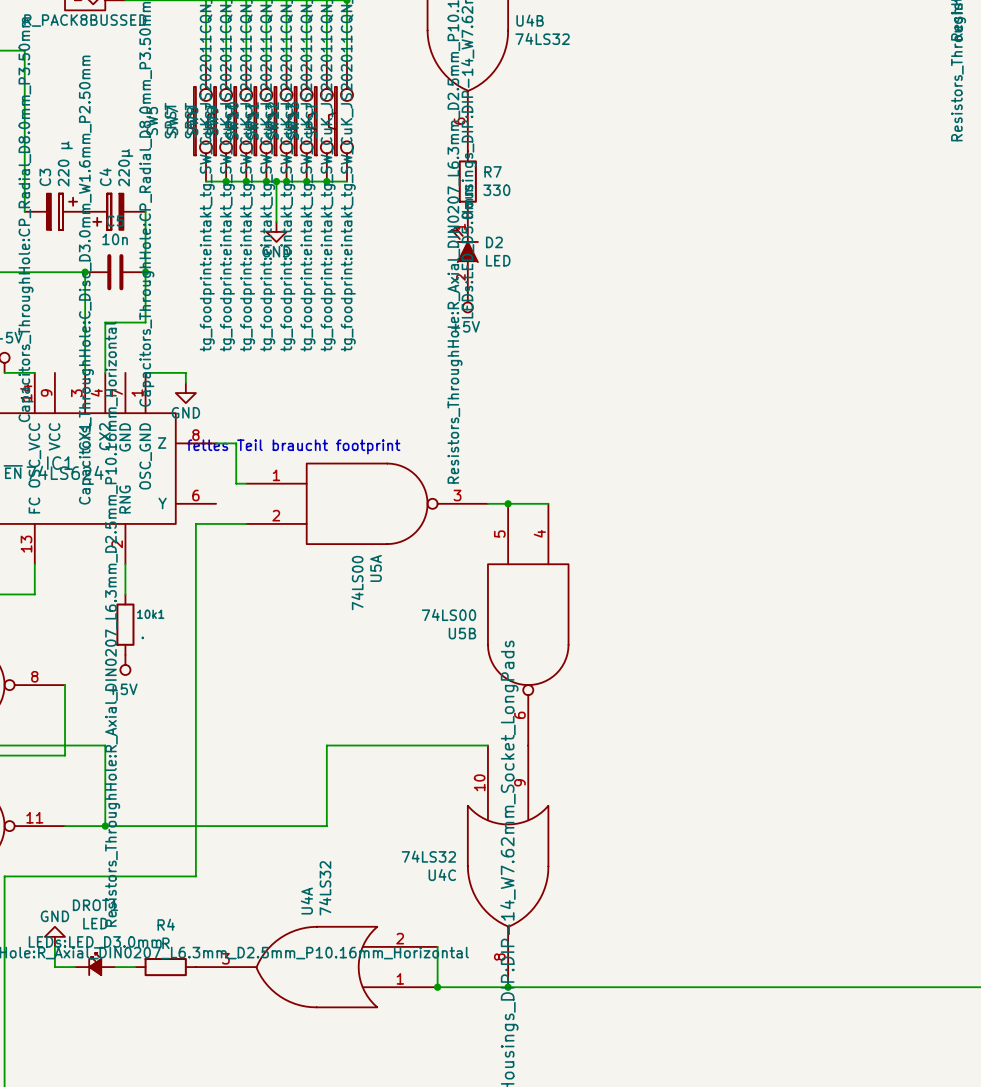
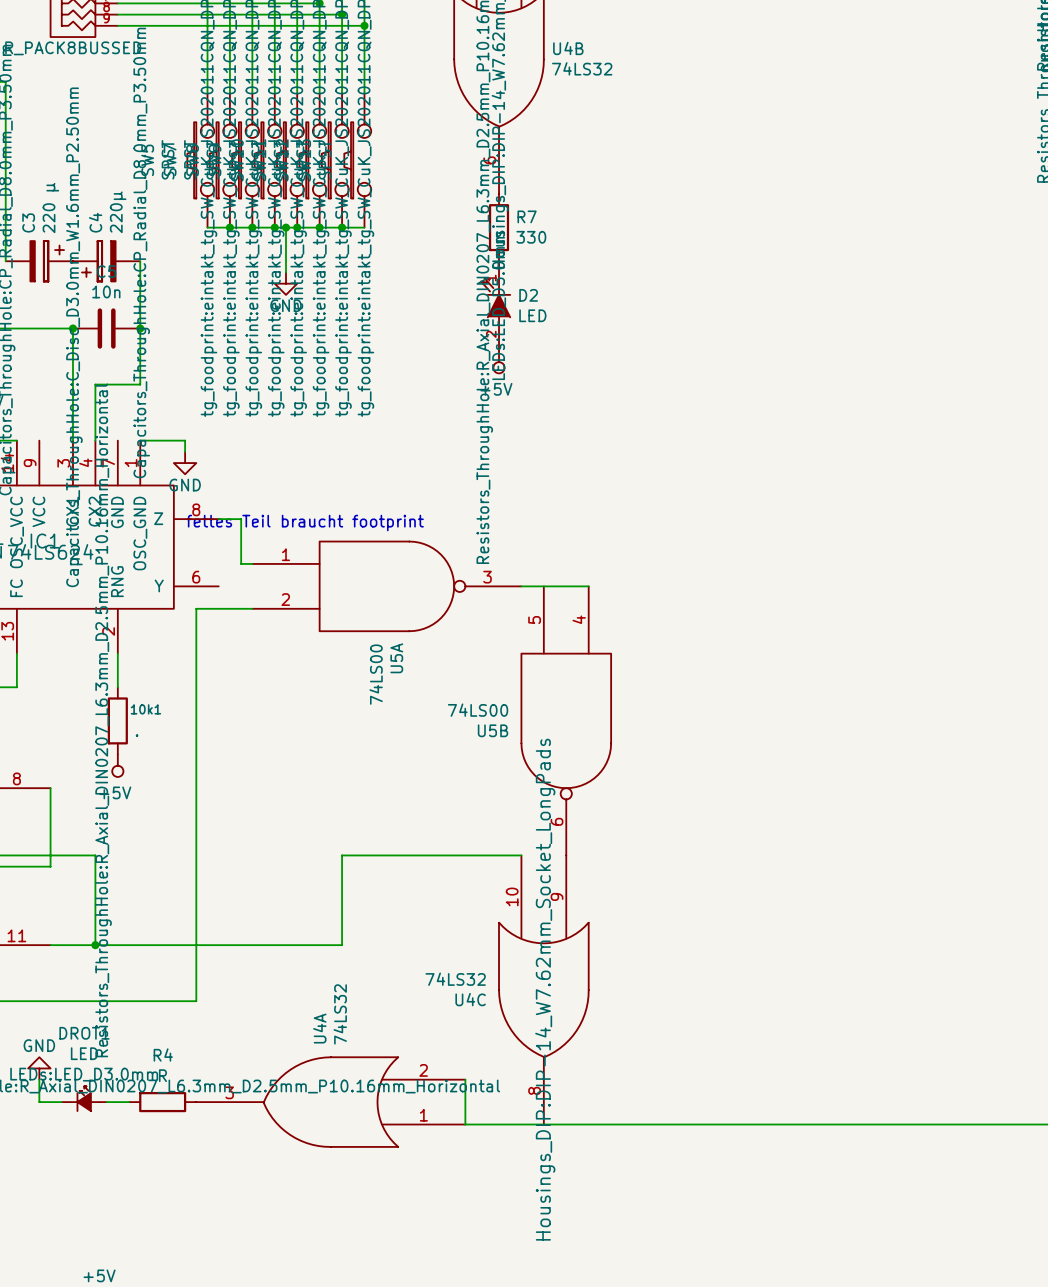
junction: (508, 503) -> none
junction: (437, 987) -> none
junction: (508, 987) -> none

